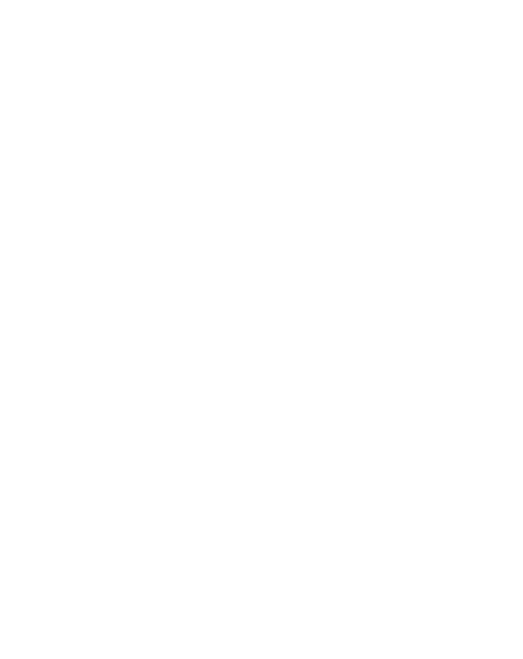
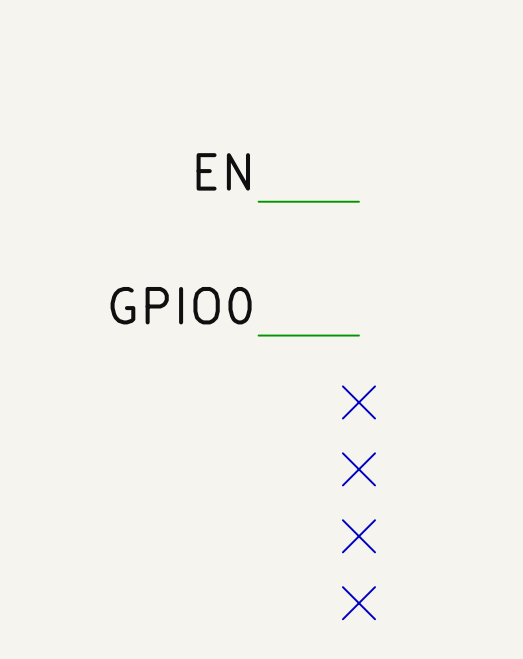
label: none -> EN (223, 171)
wire: none -> (258, 201) (358, 201)
label: none -> GPIO0 (181, 305)
wire: none -> (258, 335) (358, 335)
no-connect mark: none -> (358, 402)
no-connect mark: none -> (358, 469)
no-connect mark: none -> (358, 536)
no-connect mark: none -> (358, 603)

